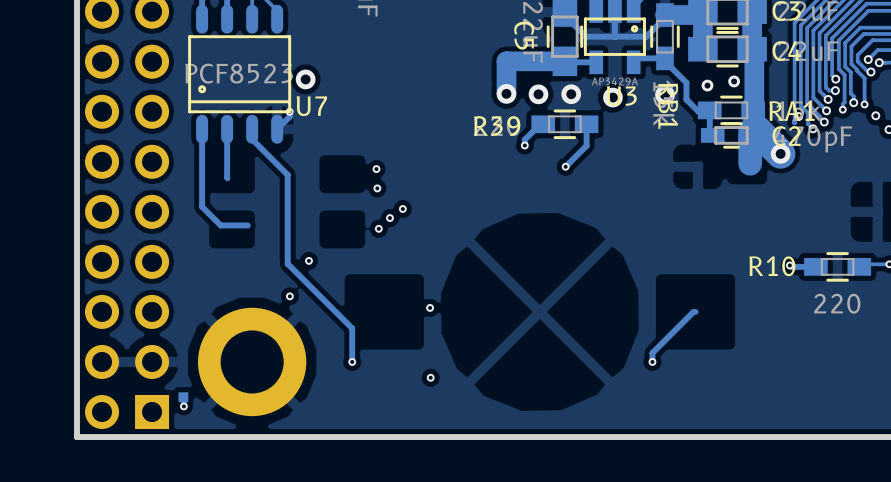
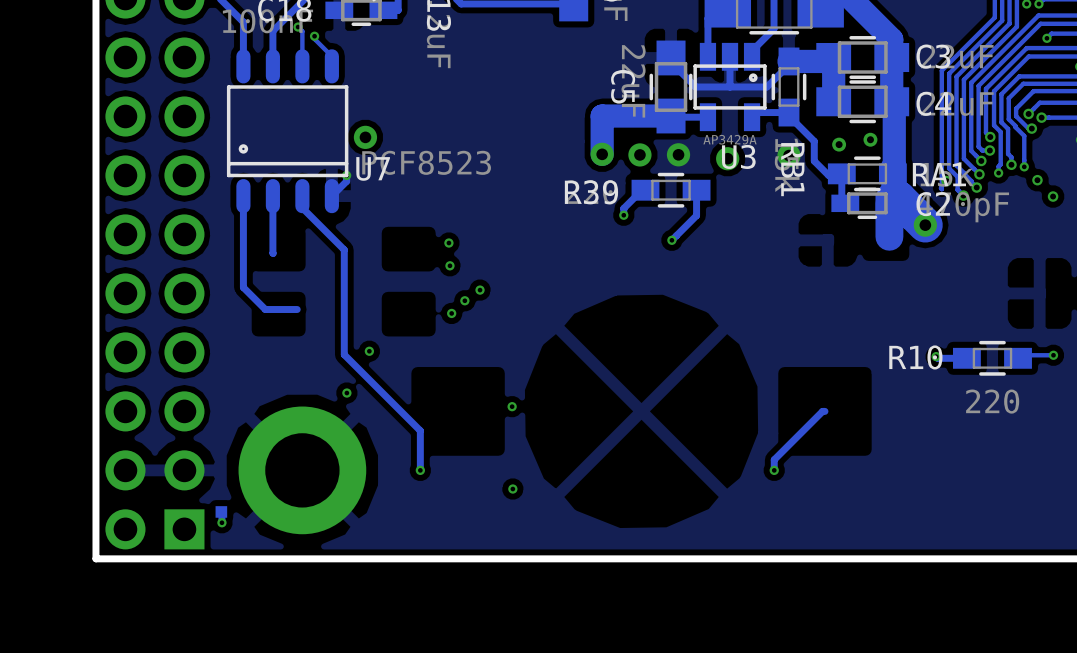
U7 value position: PCF8523 (239, 73) -> PCF8523 (426, 162)

